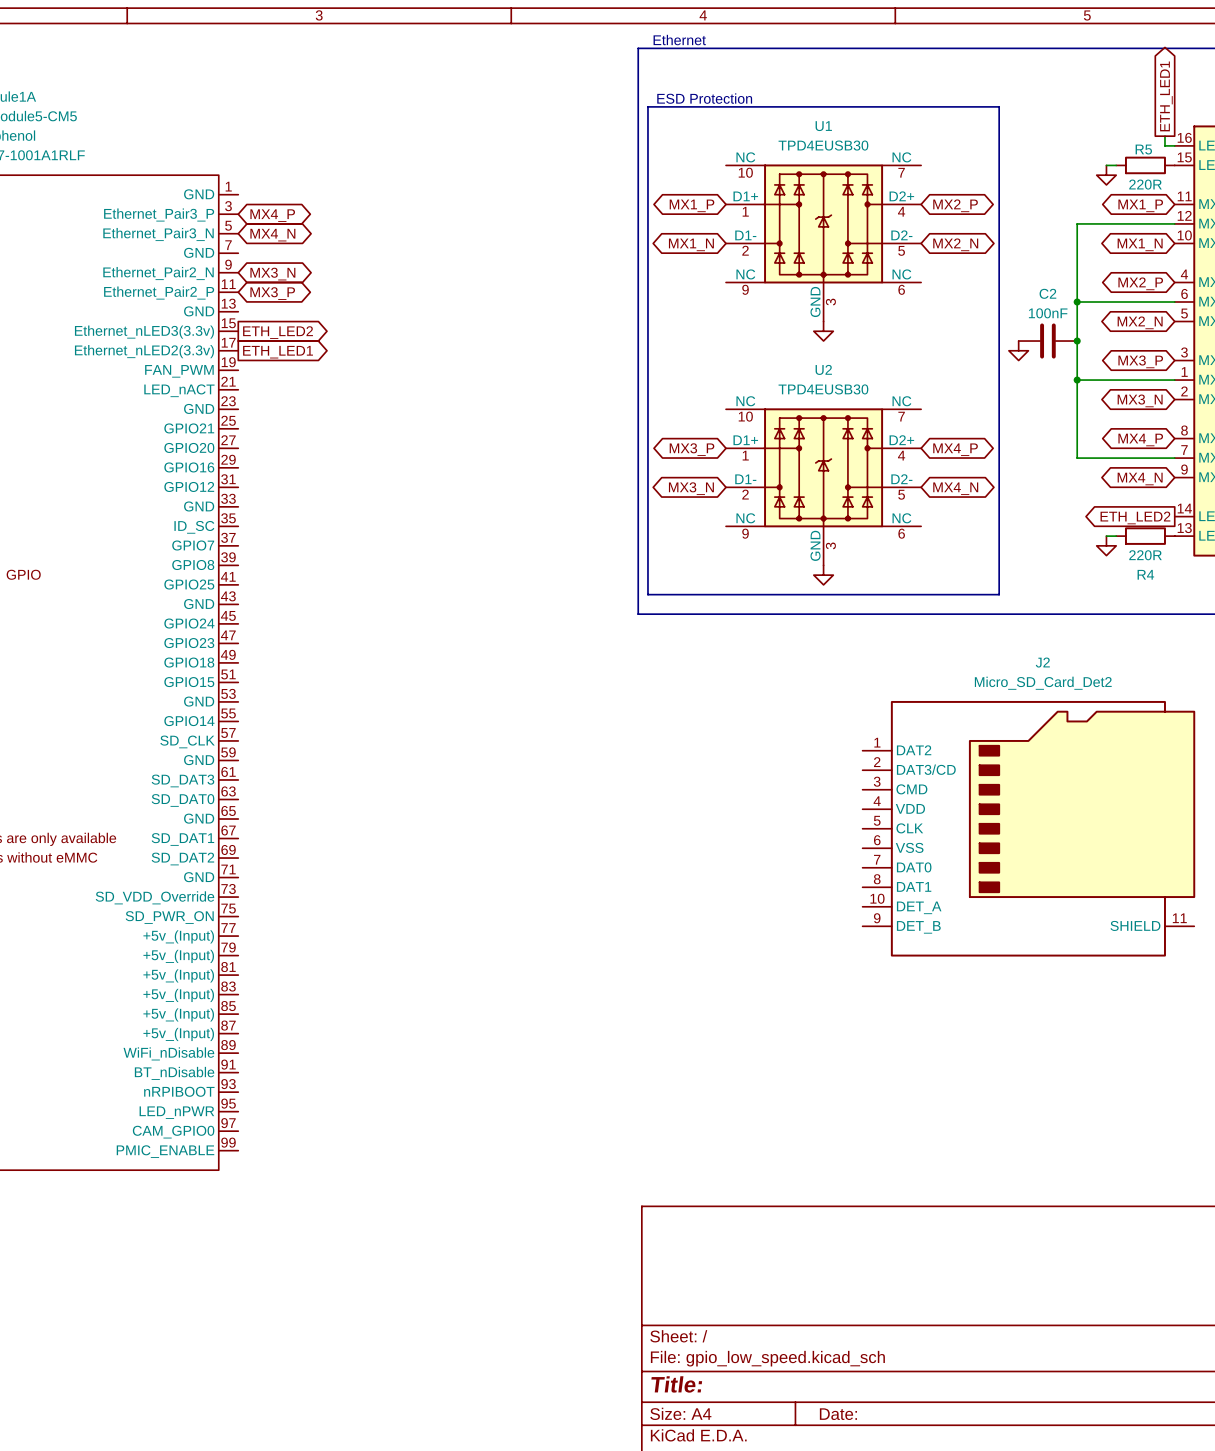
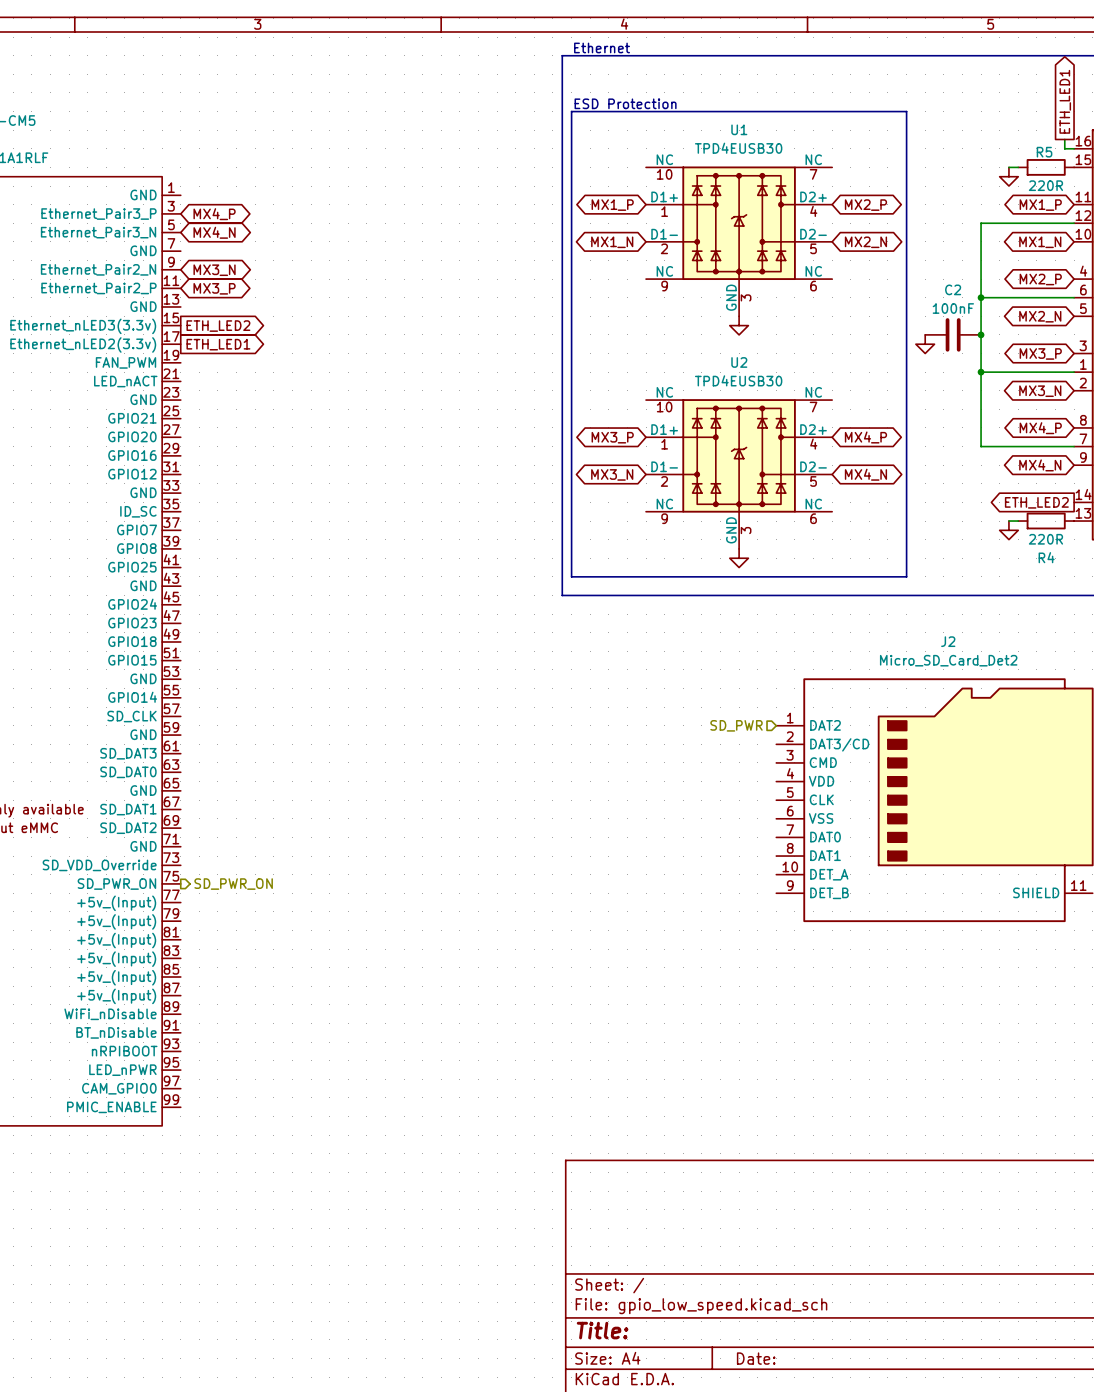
hierarchical label: none -> SD_PWR (736, 725)
hierarchical label: none -> SD_PWR_ON (233, 884)

